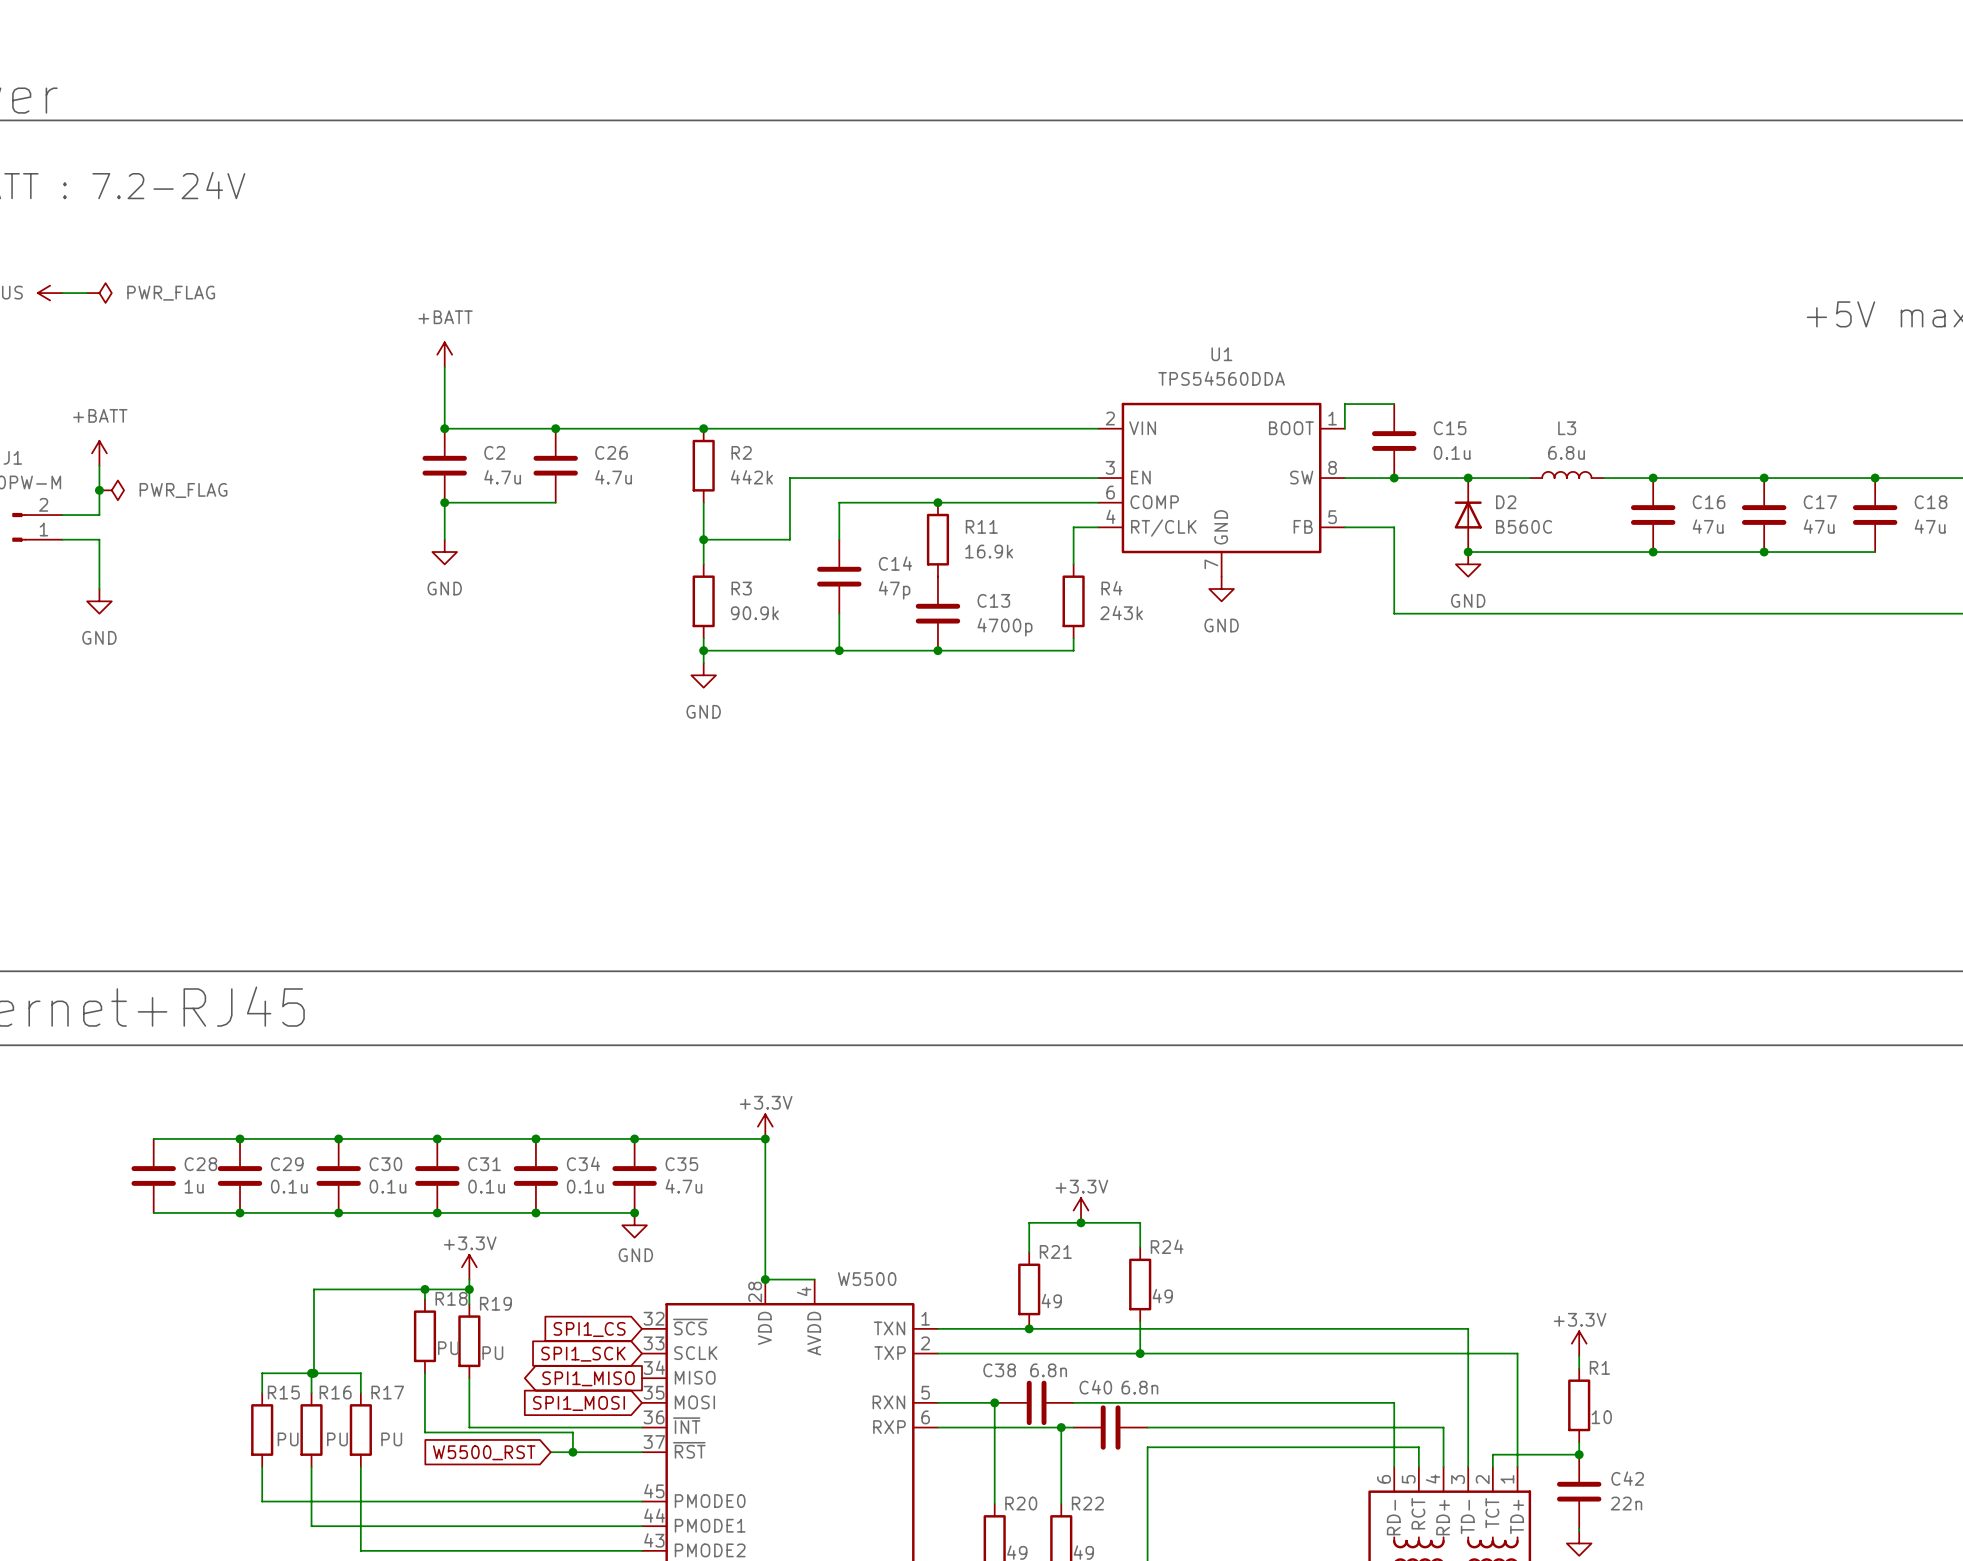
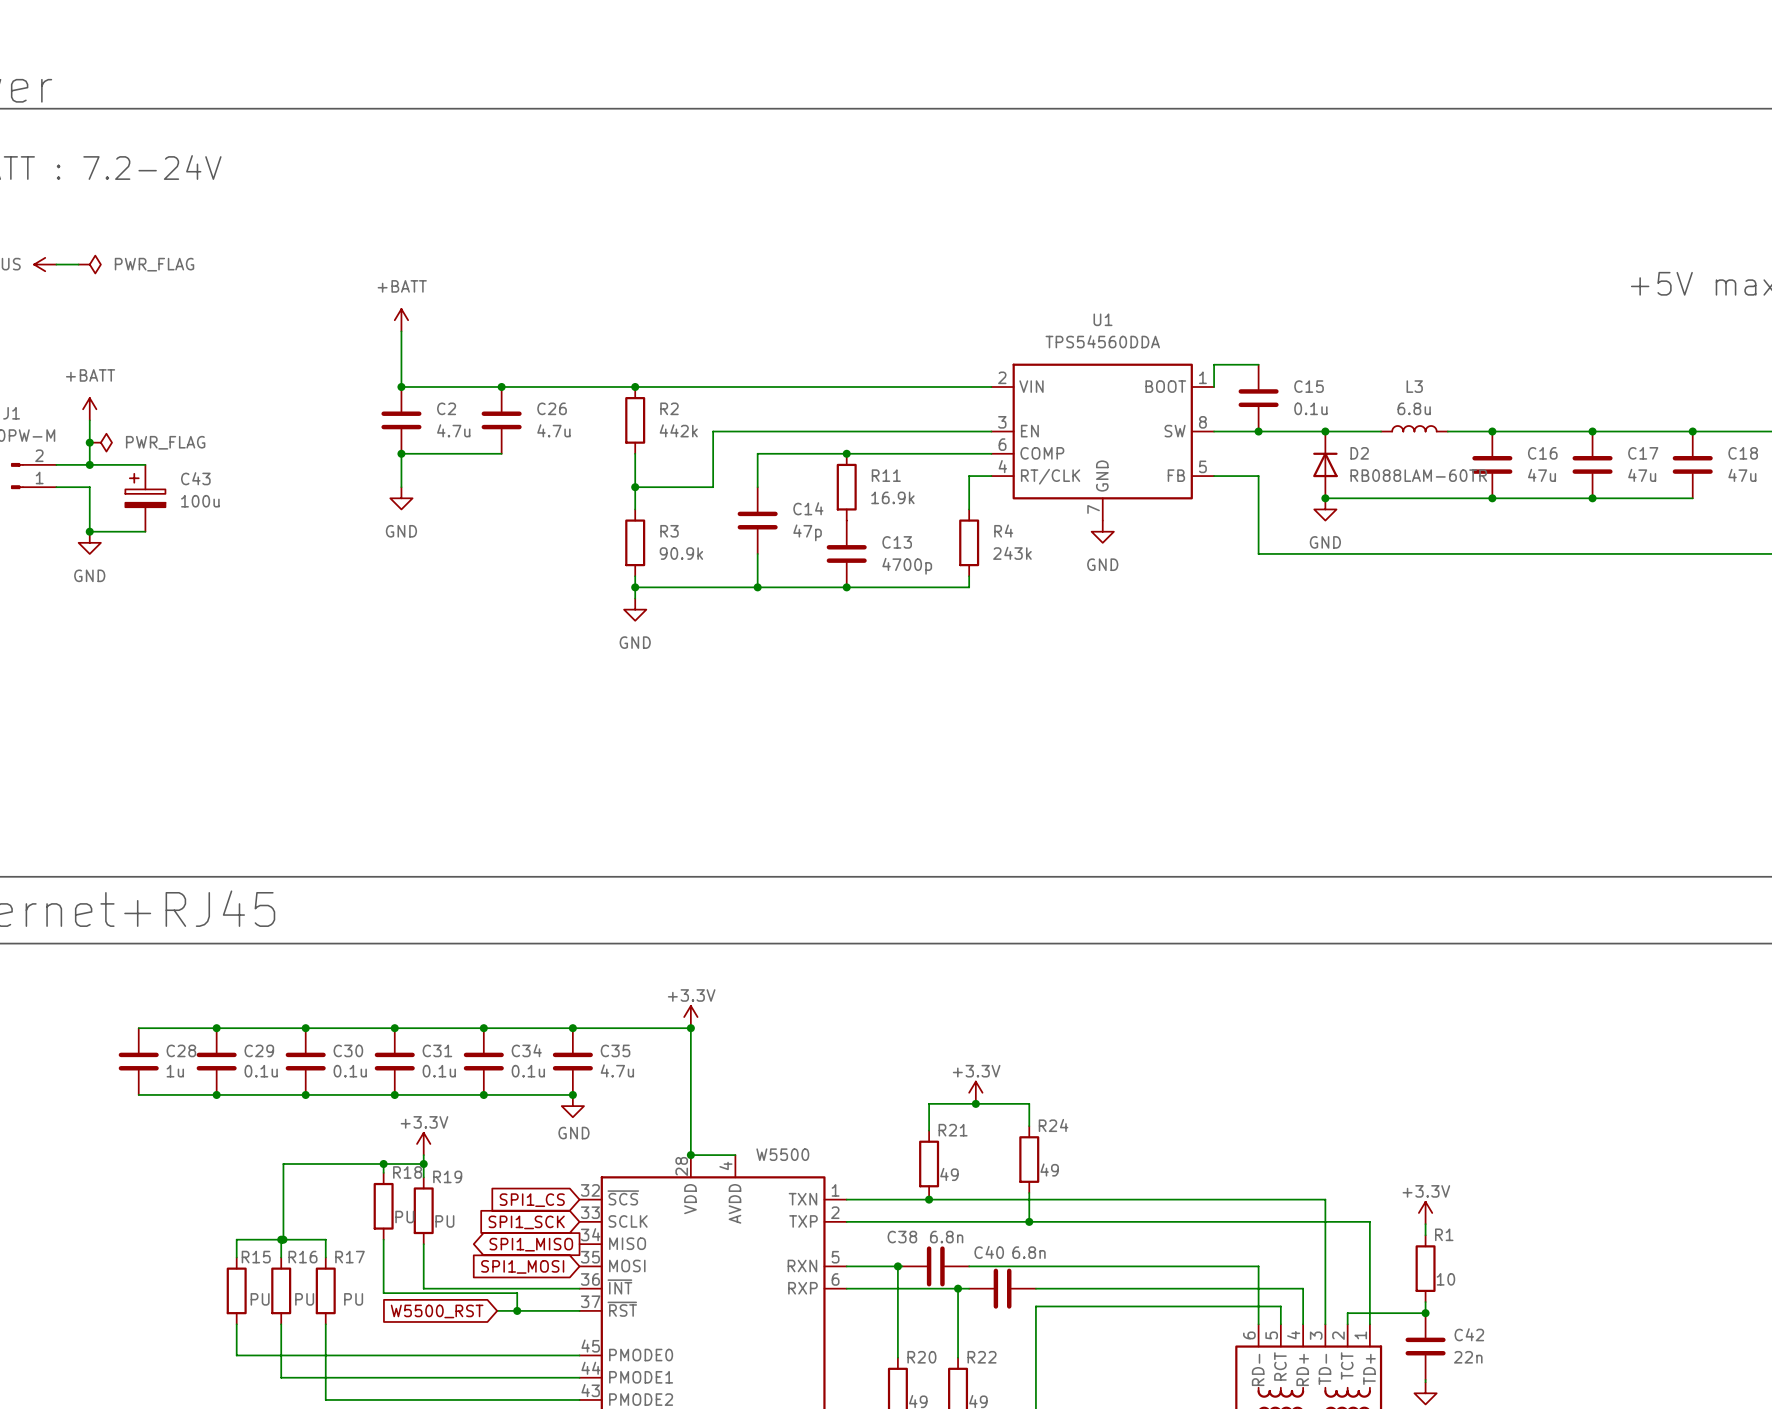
wire: none -> (89, 464) (145, 464)
junction: none -> (89, 464)
D2 value: B560C (1524, 526) -> RB088LAM-60TR (1418, 475)
C43: none -> 100u (145, 498)
wire: none -> (89, 531) (145, 531)
junction: none -> (89, 531)

